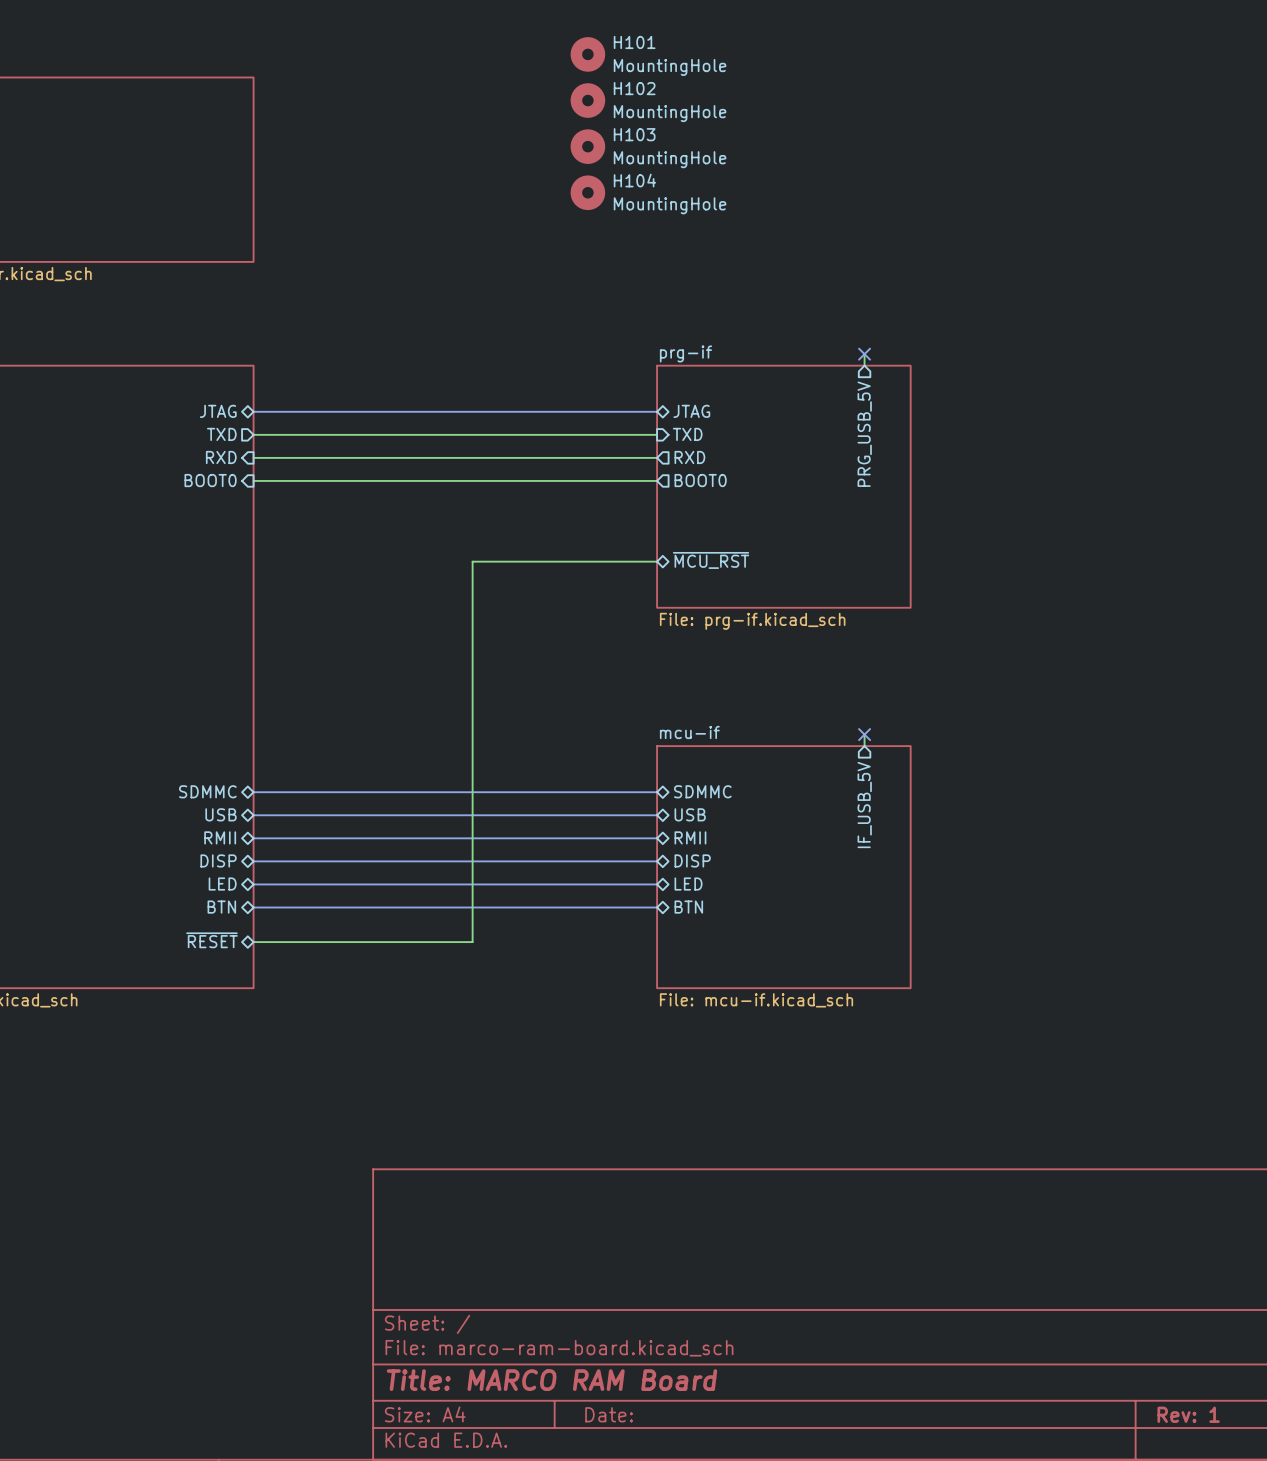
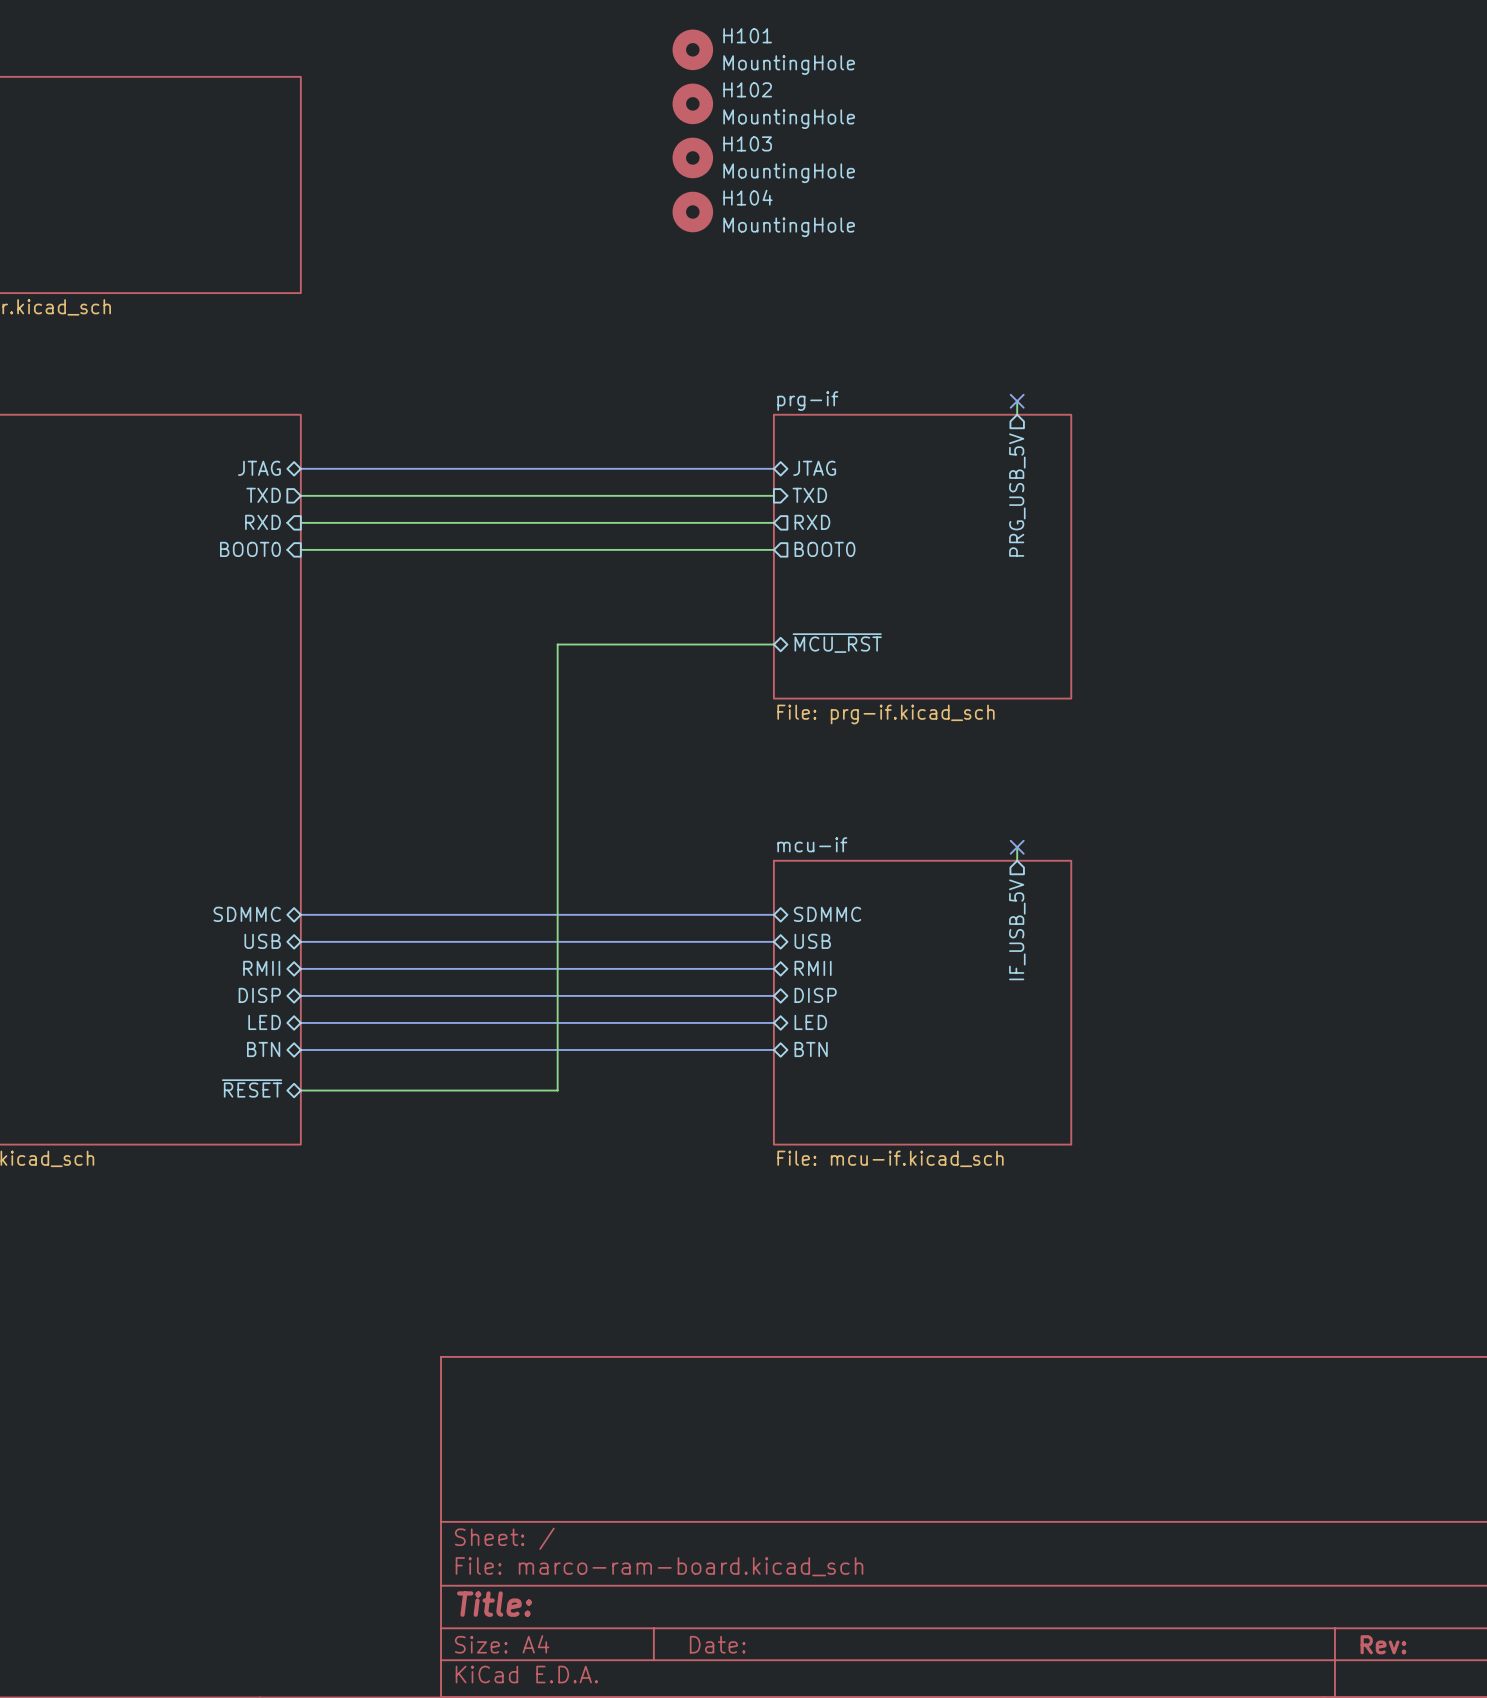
title block: Title: MARCO RAM Board (551, 1380) -> Title: (494, 1604)
title block: Rev: 1 (1188, 1414) -> Rev: (1383, 1644)

